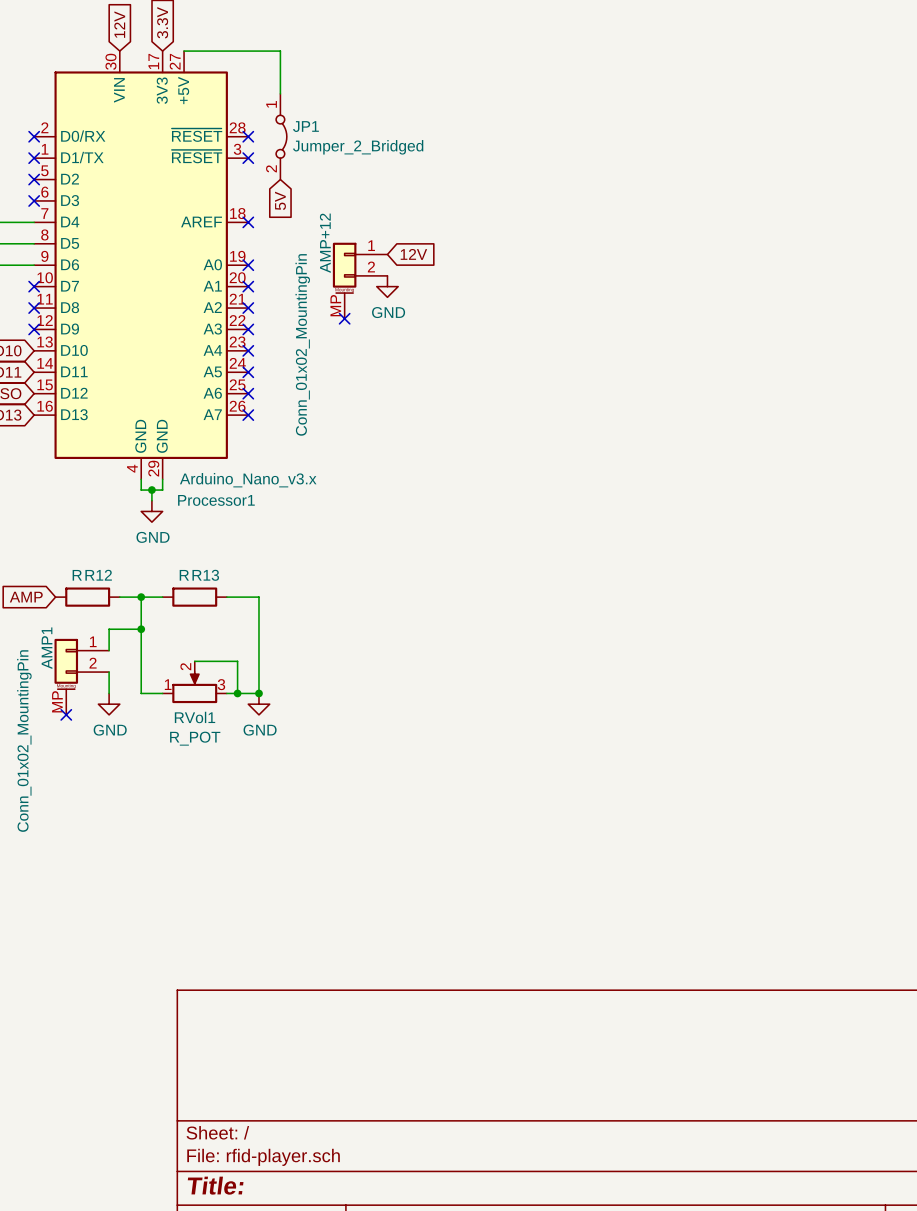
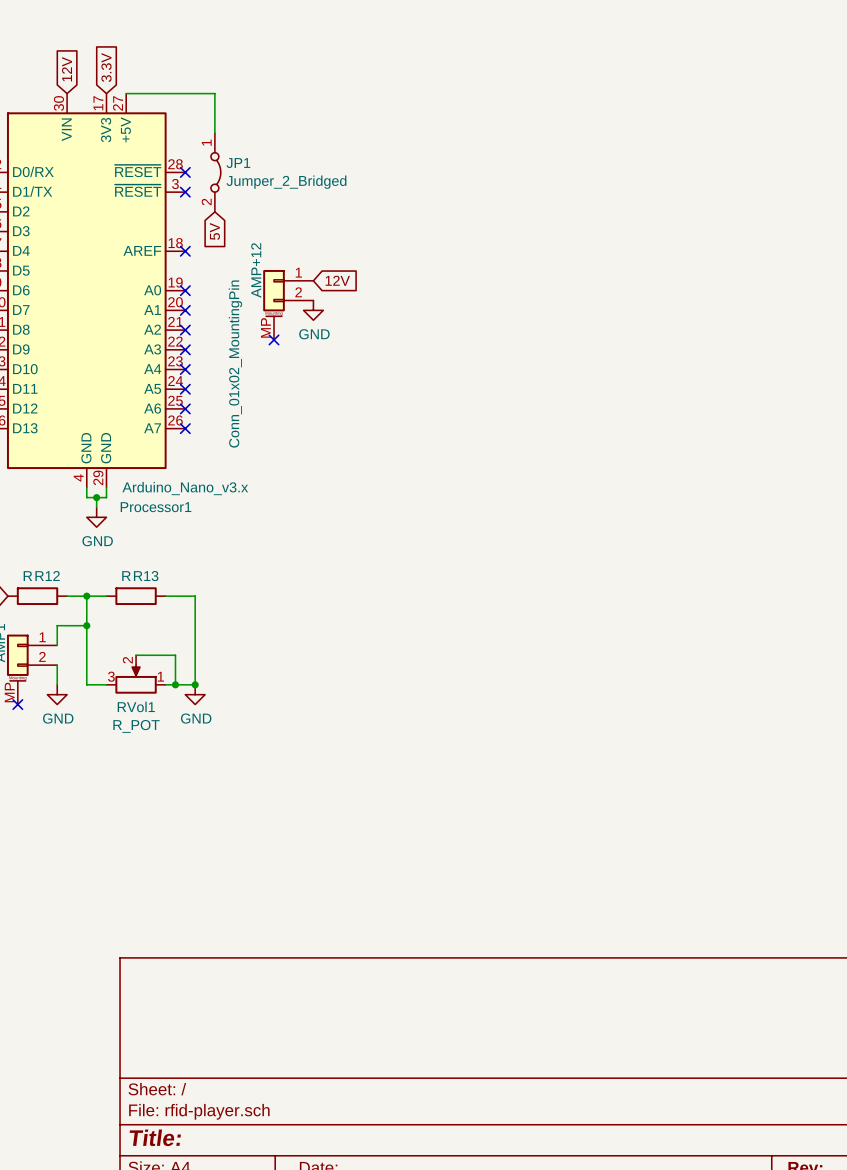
RVol1 flip: as is (194, 687) -> left-right (136, 679)

